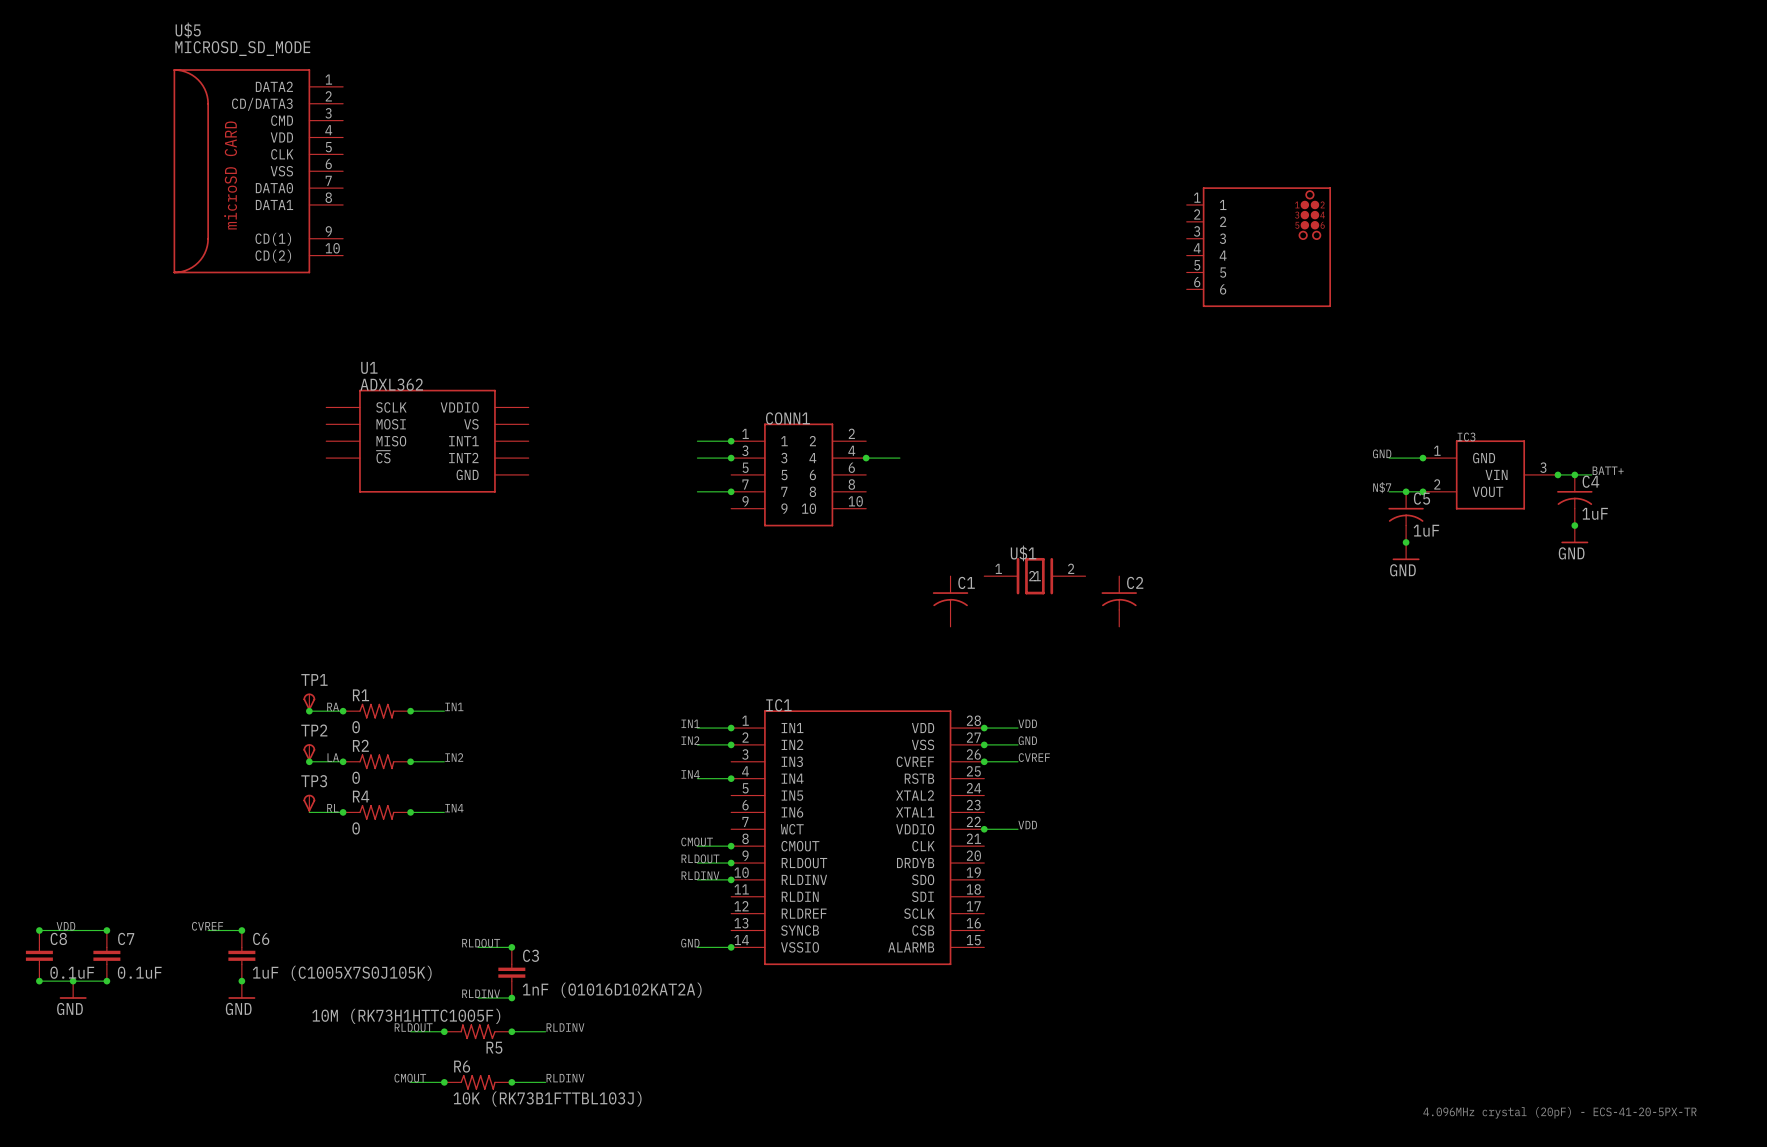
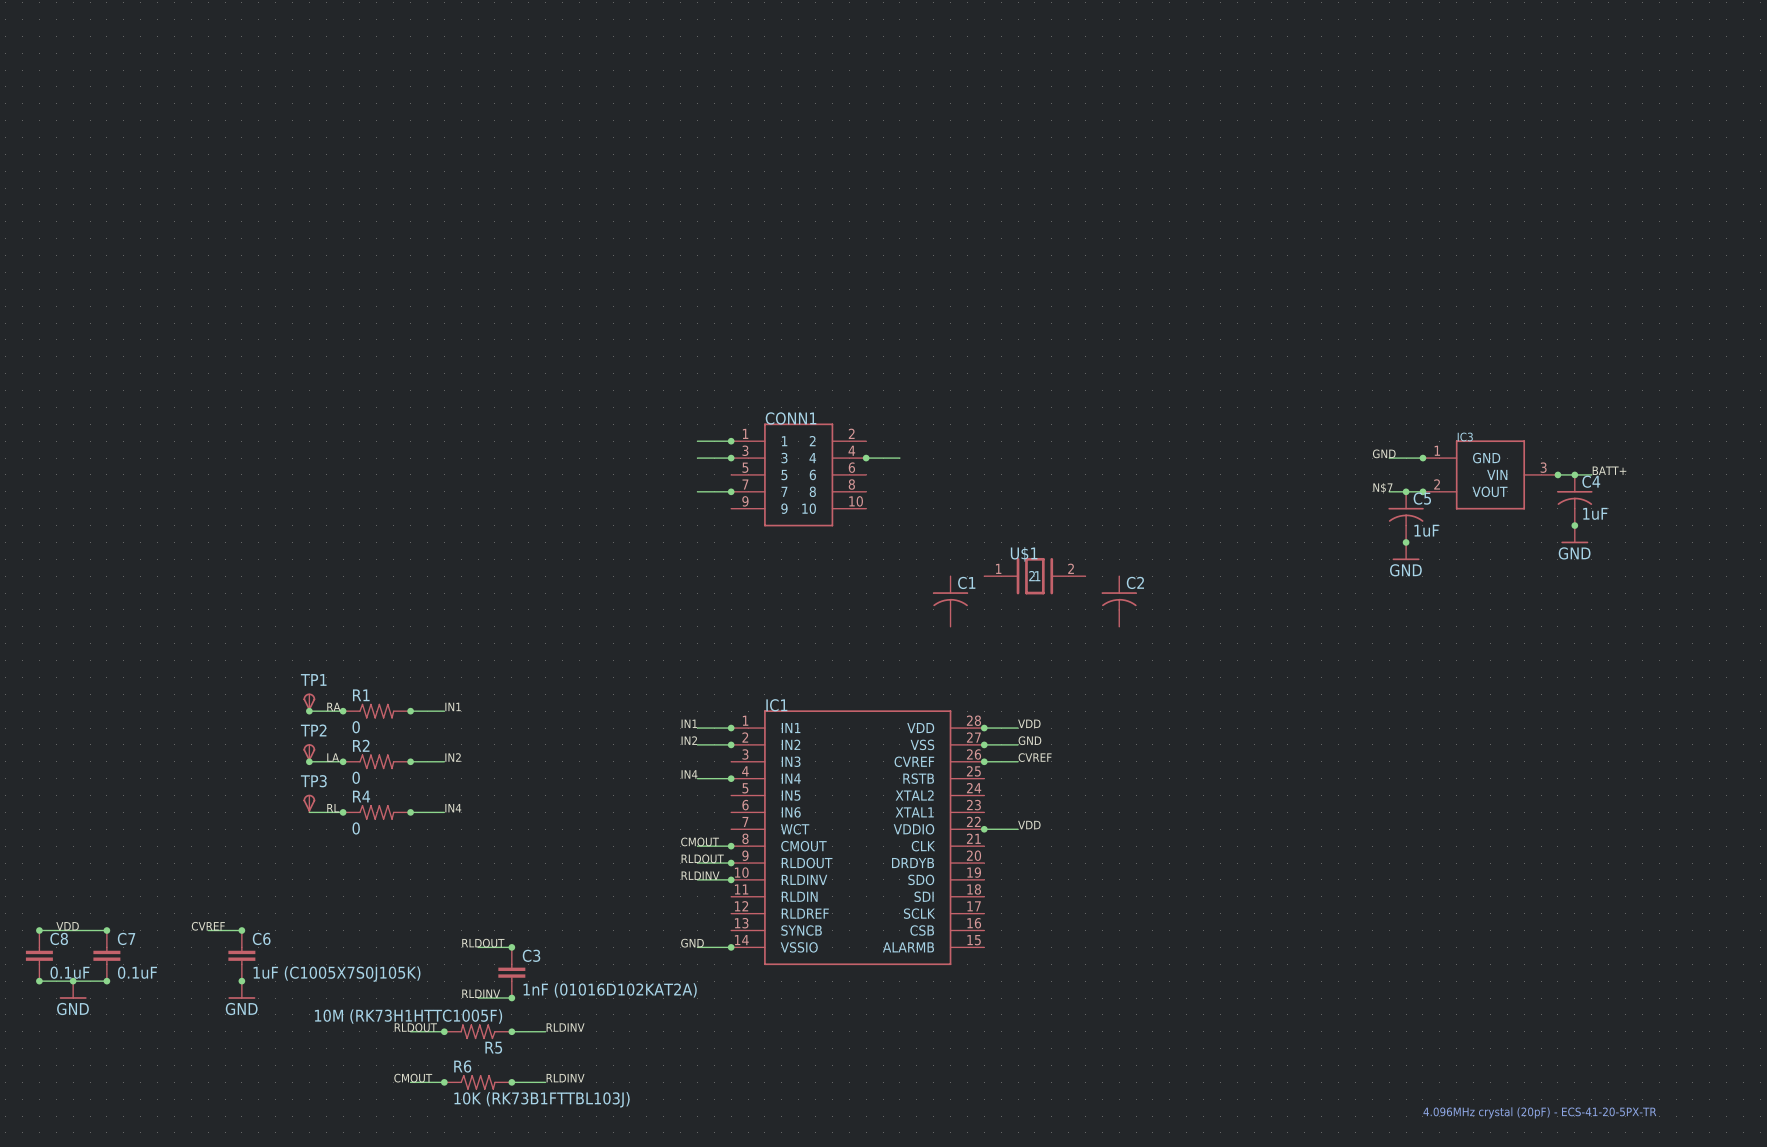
U$5: MICROSD_SD_MODE (258, 171) -> none
part: (1258, 247) -> none
U1: ADXL362 (427, 441) -> none

